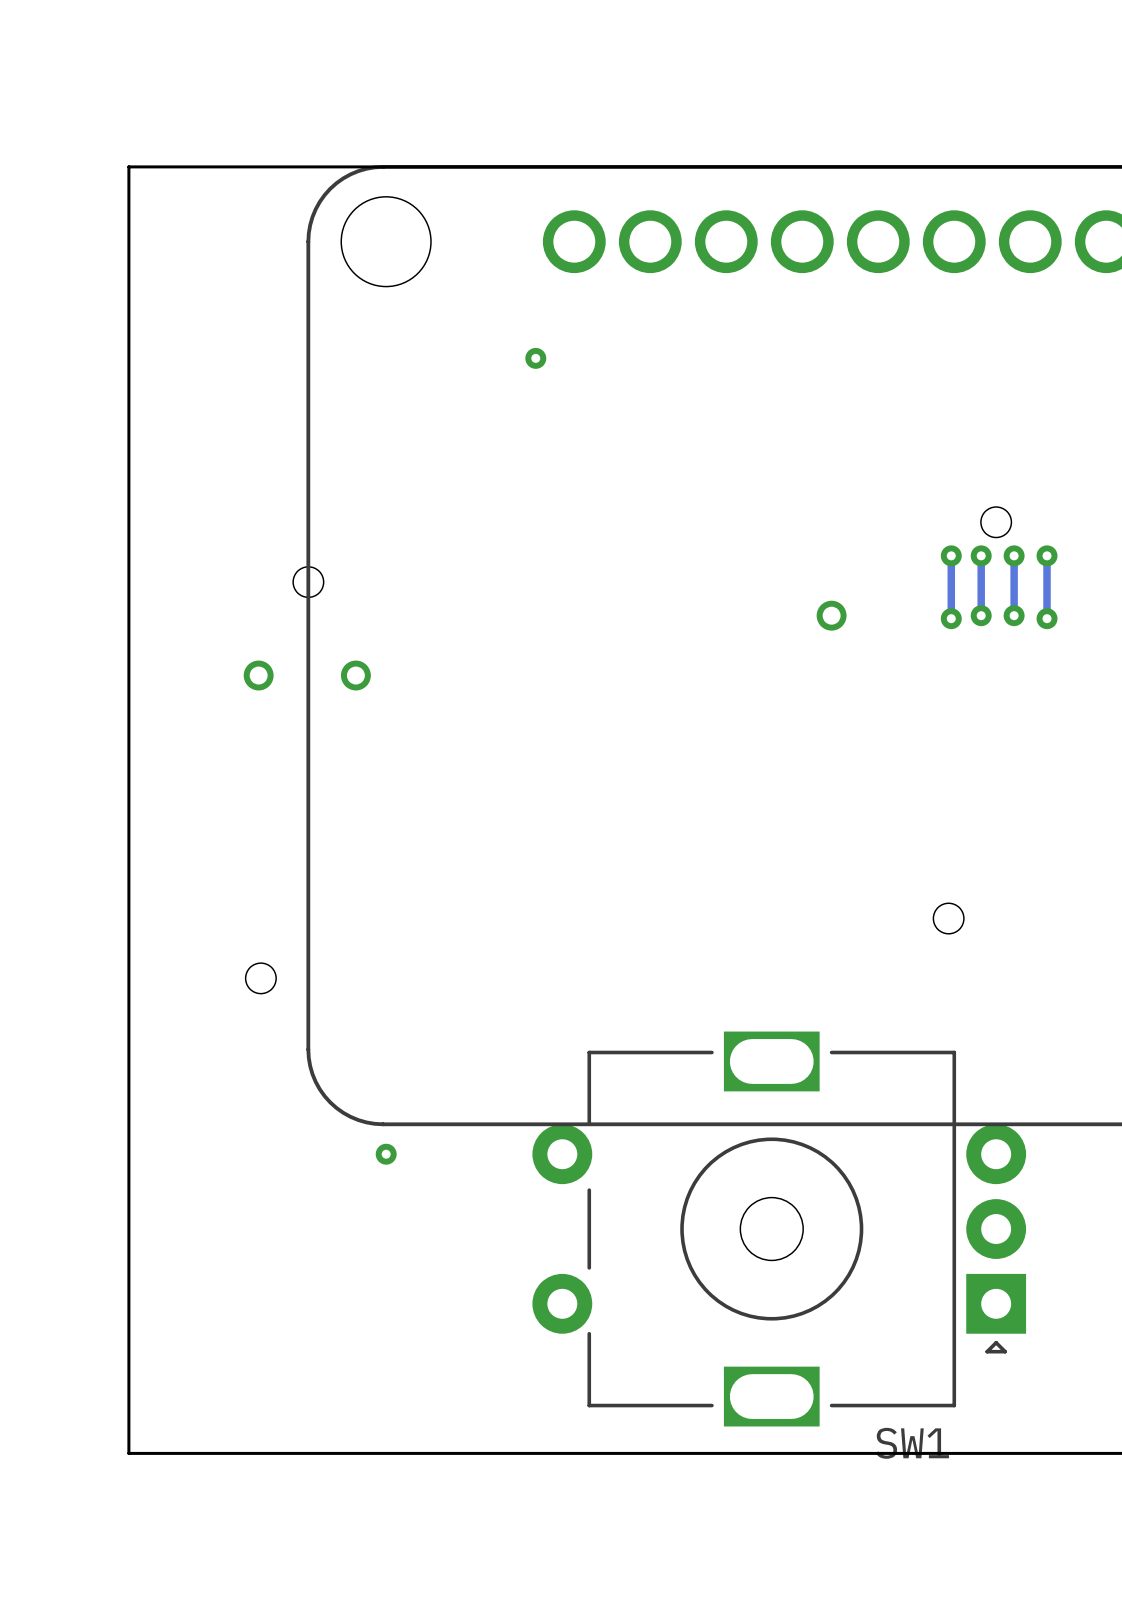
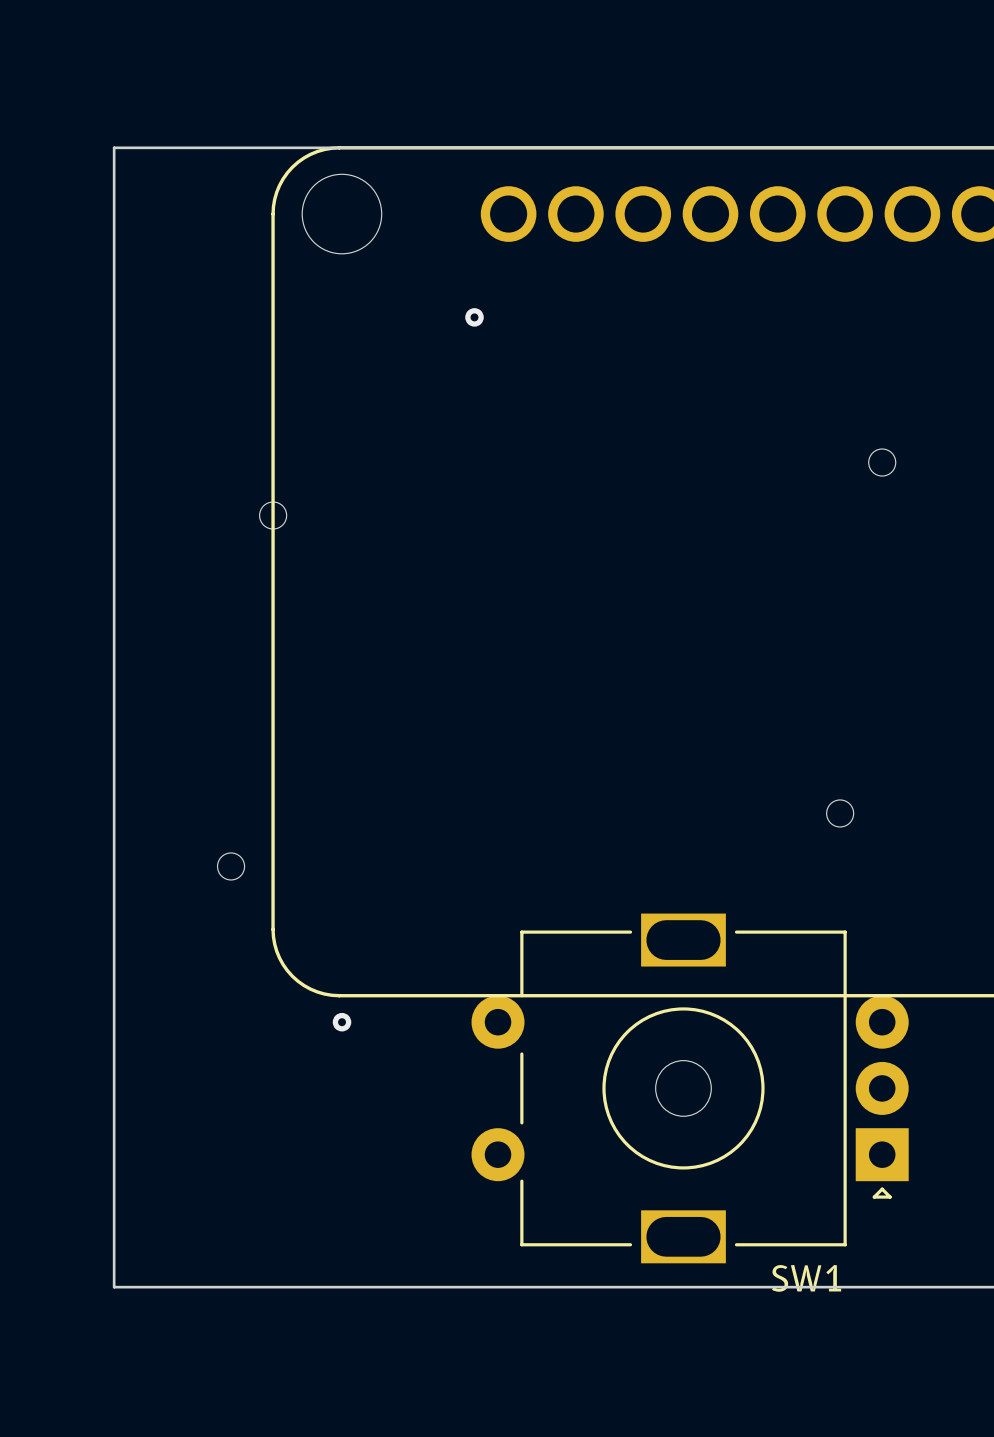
track: (951, 555) (951, 618) -> none
via: (951, 555) -> none
track: (981, 555) (981, 615) -> none
via: (981, 555) -> none
track: (1014, 555) (1014, 615) -> none
via: (1014, 555) -> none
track: (1047, 555) (1047, 618) -> none
via: (1047, 555) -> none
via: (831, 615) -> none
via: (981, 615) -> none
via: (1014, 615) -> none
via: (951, 618) -> none
via: (1047, 618) -> none
via: (258, 675) -> none
via: (355, 675) -> none

